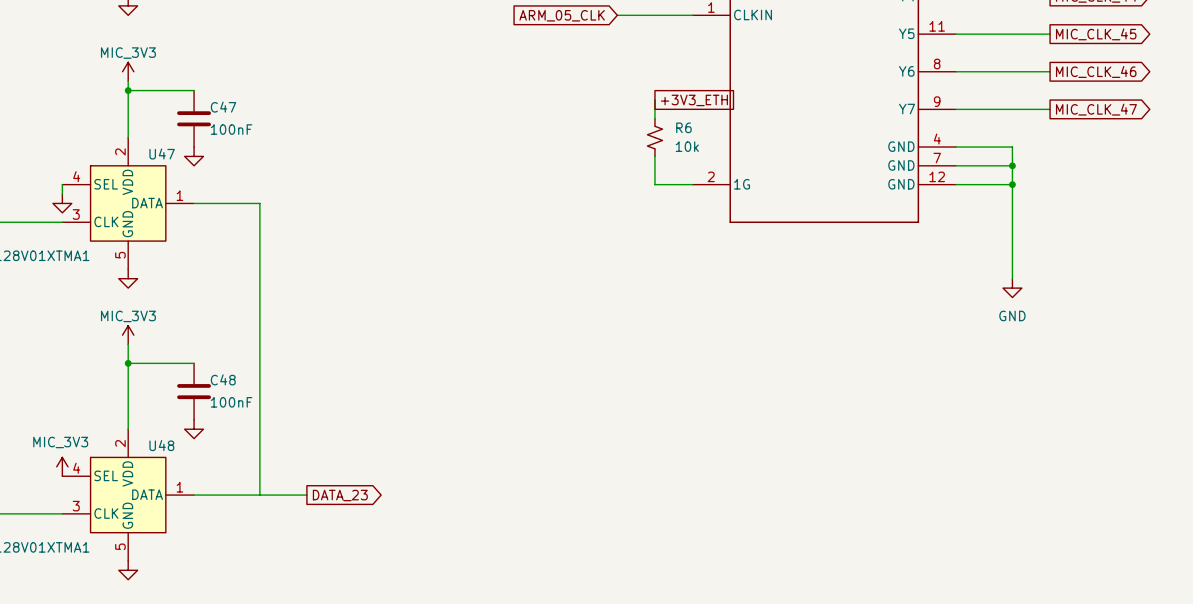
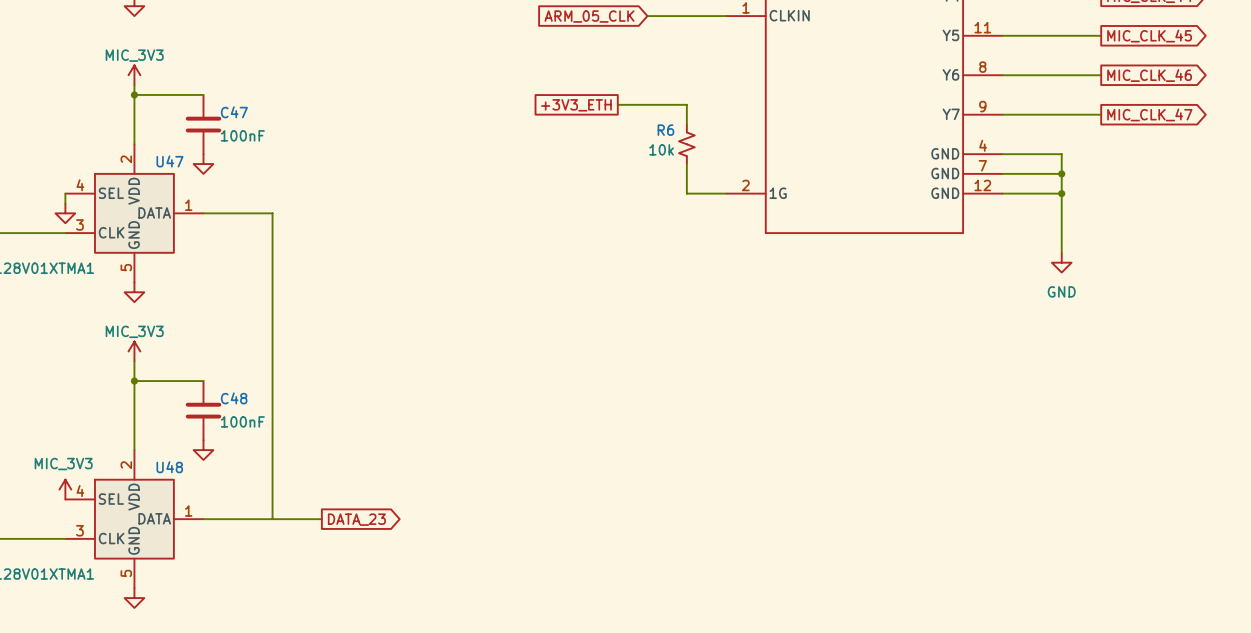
wire: none -> (617, 104) (686, 104)
global label rotation: 0° (694, 100) -> 180° (576, 105)
global label position: +3V3_ETH (694, 100) -> +3V3_ETH (576, 105)
R6 name position: R6 (683, 127) -> R6 (665, 130)
R6 value position: 10k (687, 146) -> 10k (661, 149)
wire: (1012, 241) (1012, 278) -> none
power symbol position: GND (1012, 288) -> GND (1061, 262)

